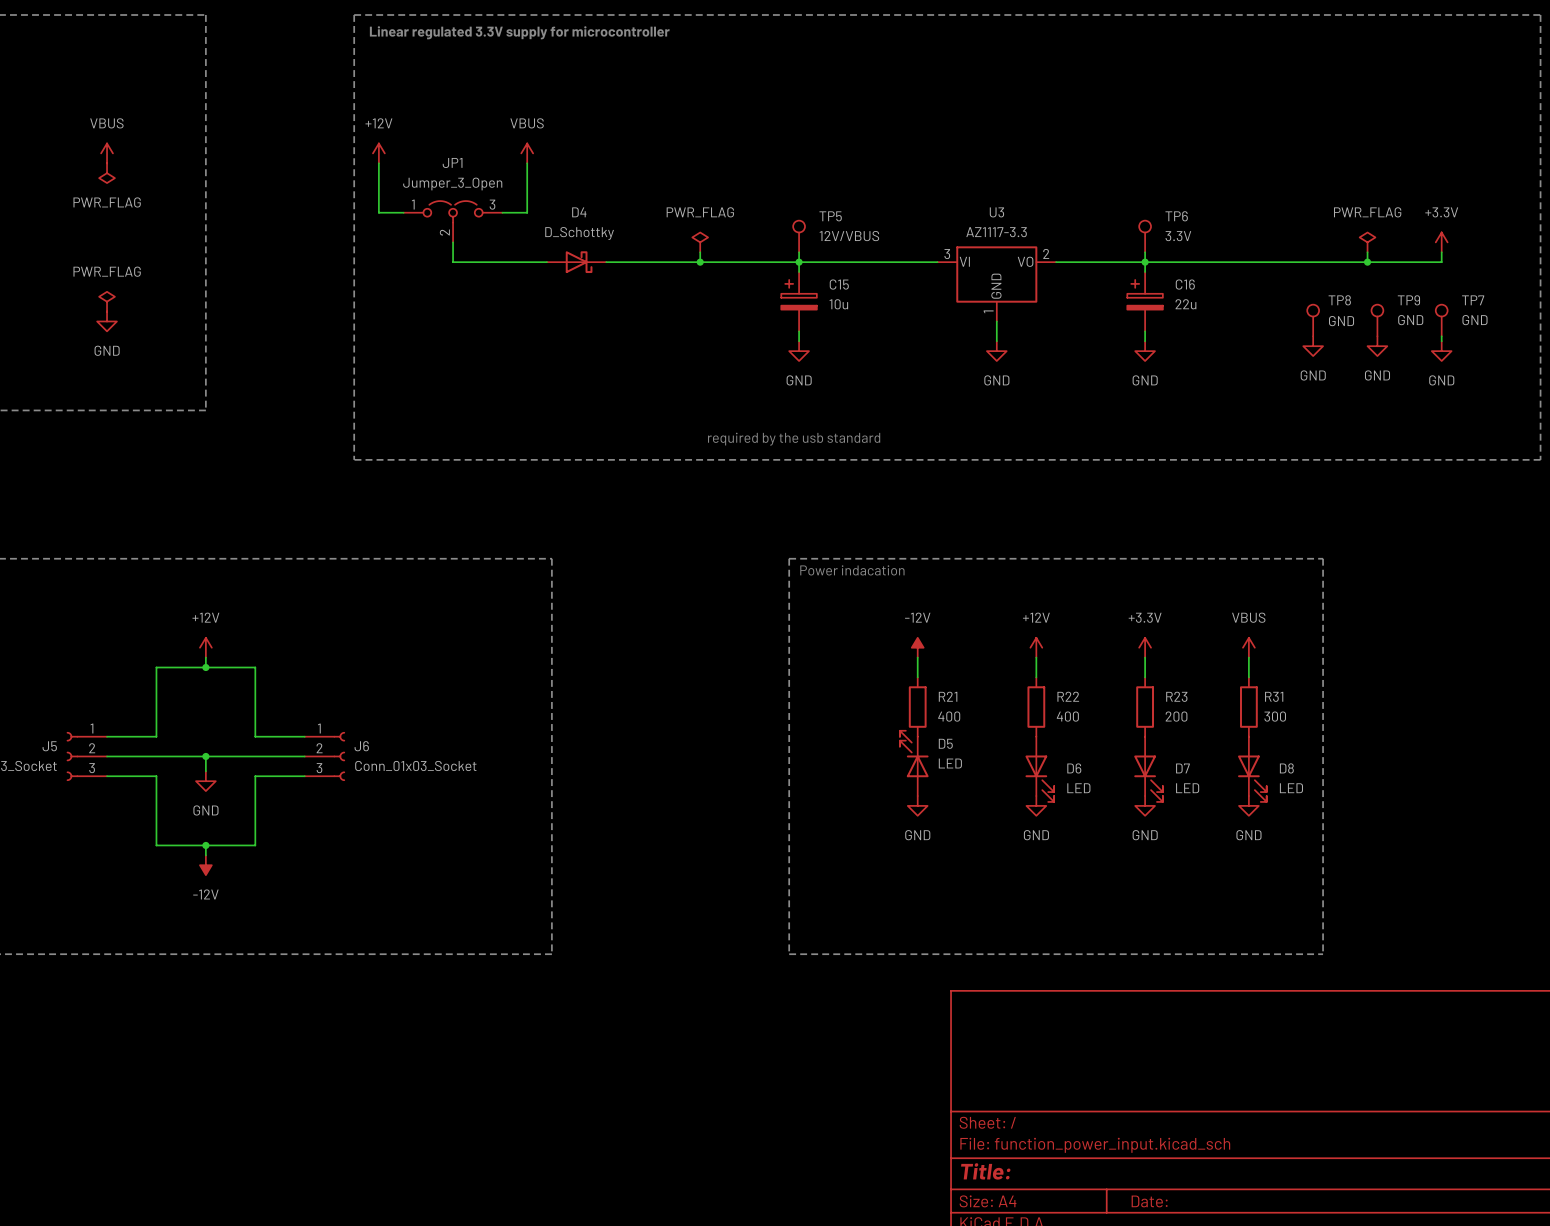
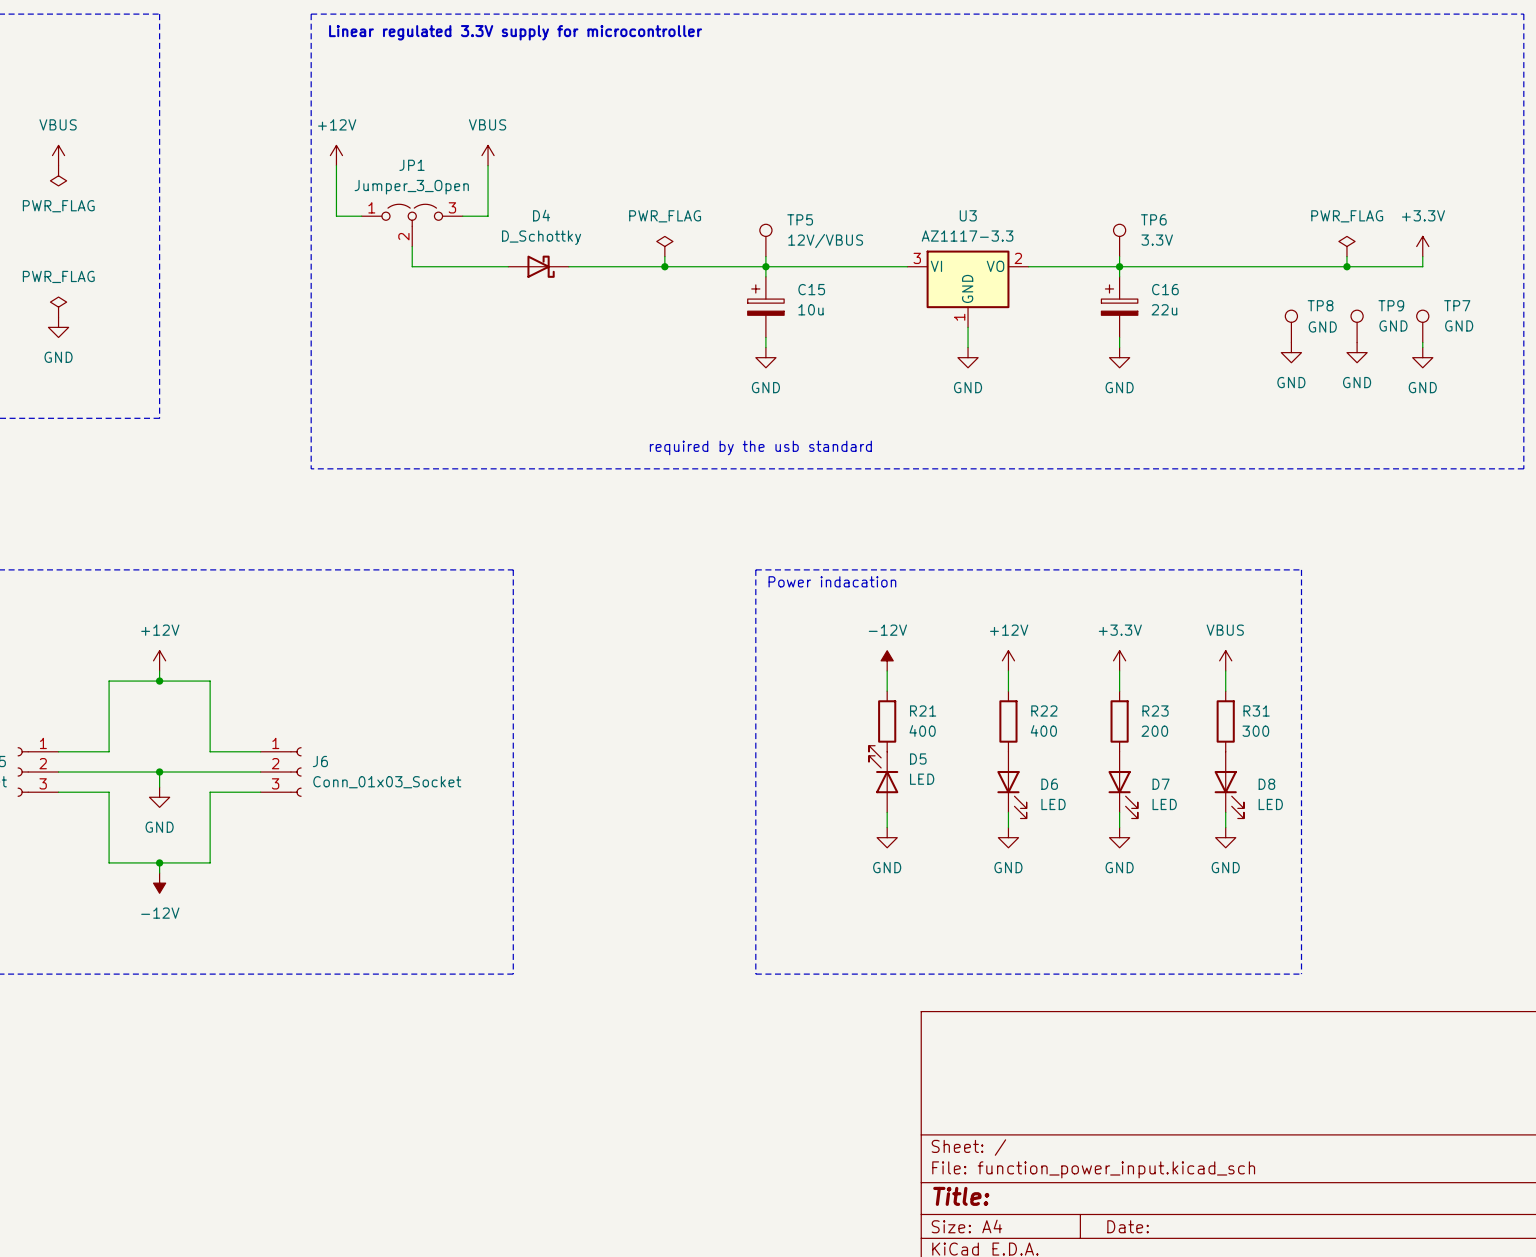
power symbol position: GND (917, 805) -> GND (887, 837)
power symbol position: GND (1036, 805) -> GND (1008, 837)
power symbol position: GND (1145, 805) -> GND (1119, 837)
power symbol position: GND (1248, 805) -> GND (1225, 837)

